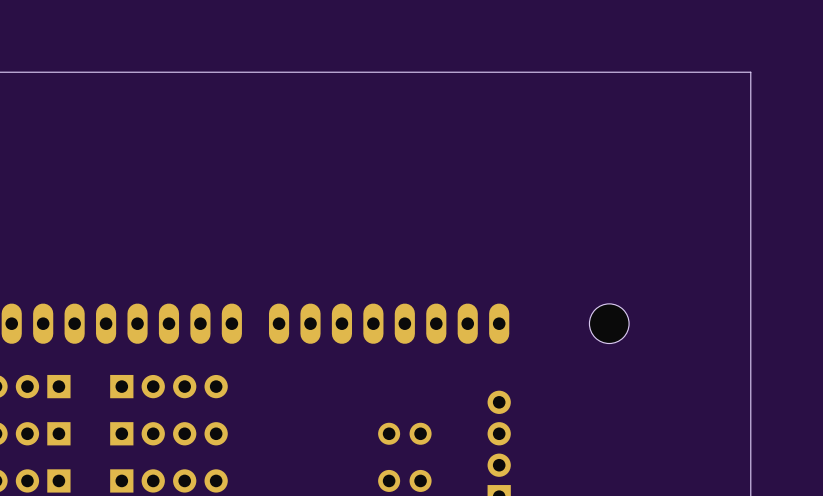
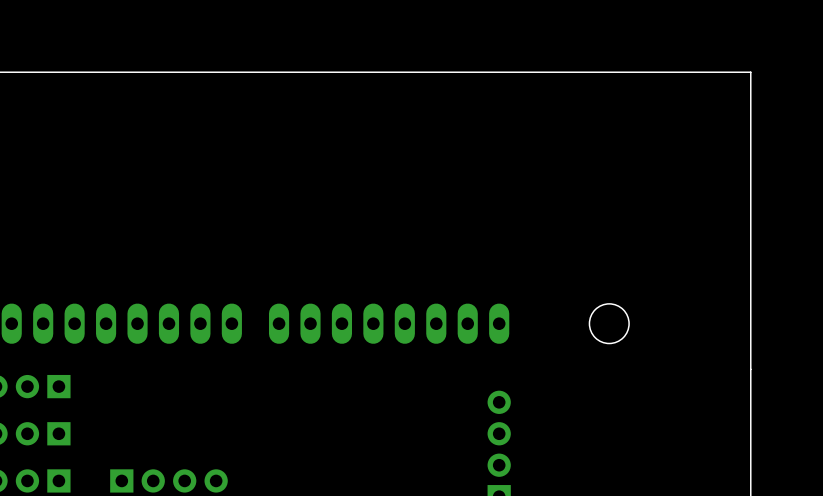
part: (168, 386) -> none
part: (168, 433) -> none
part: (404, 433) -> none
part: (404, 480) -> none

